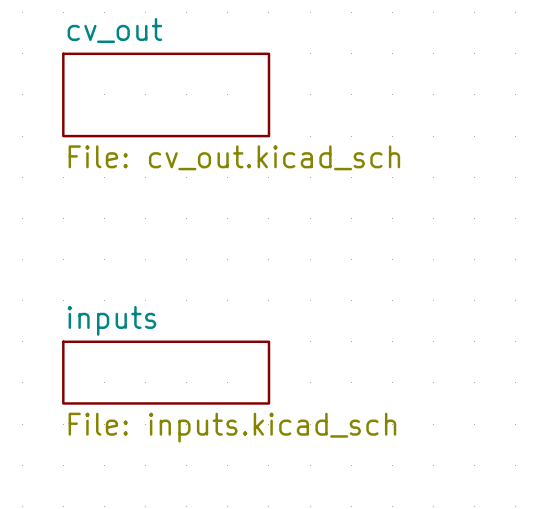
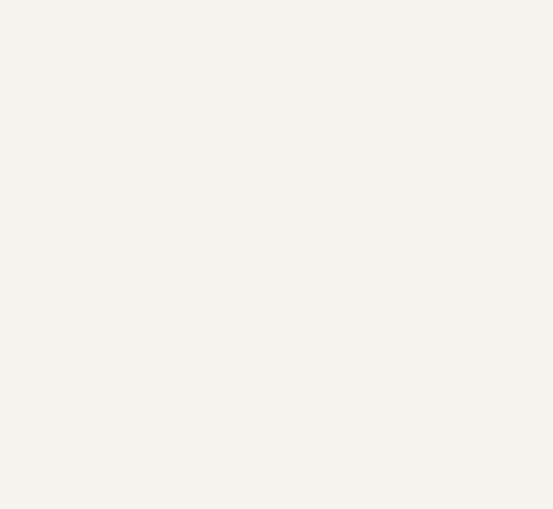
sheet cv_out: File: cv_out.kicad_sch (166, 94) -> none
sheet inputs: File: inputs.kicad_sch (166, 372) -> none

